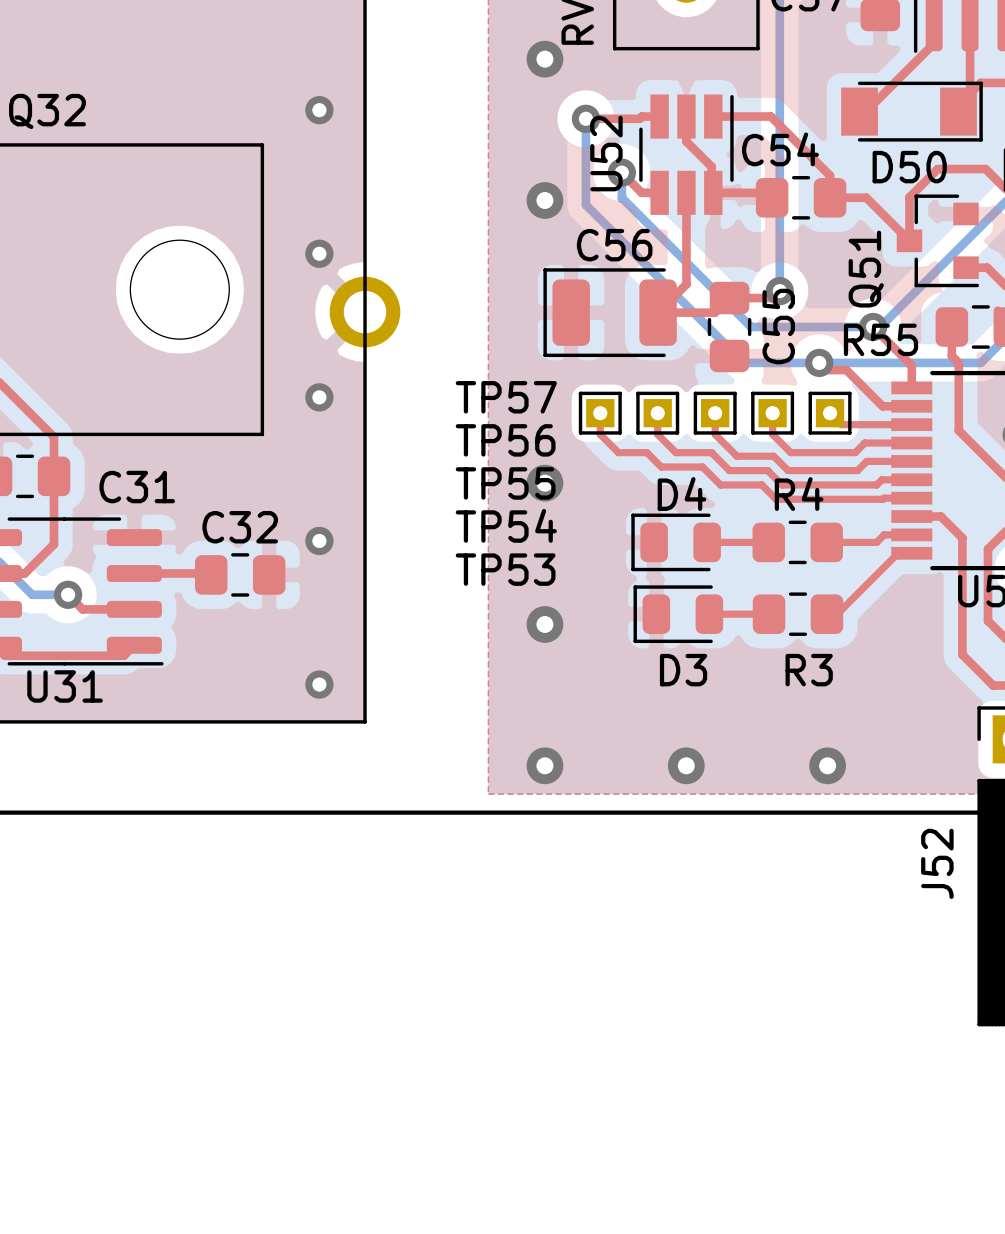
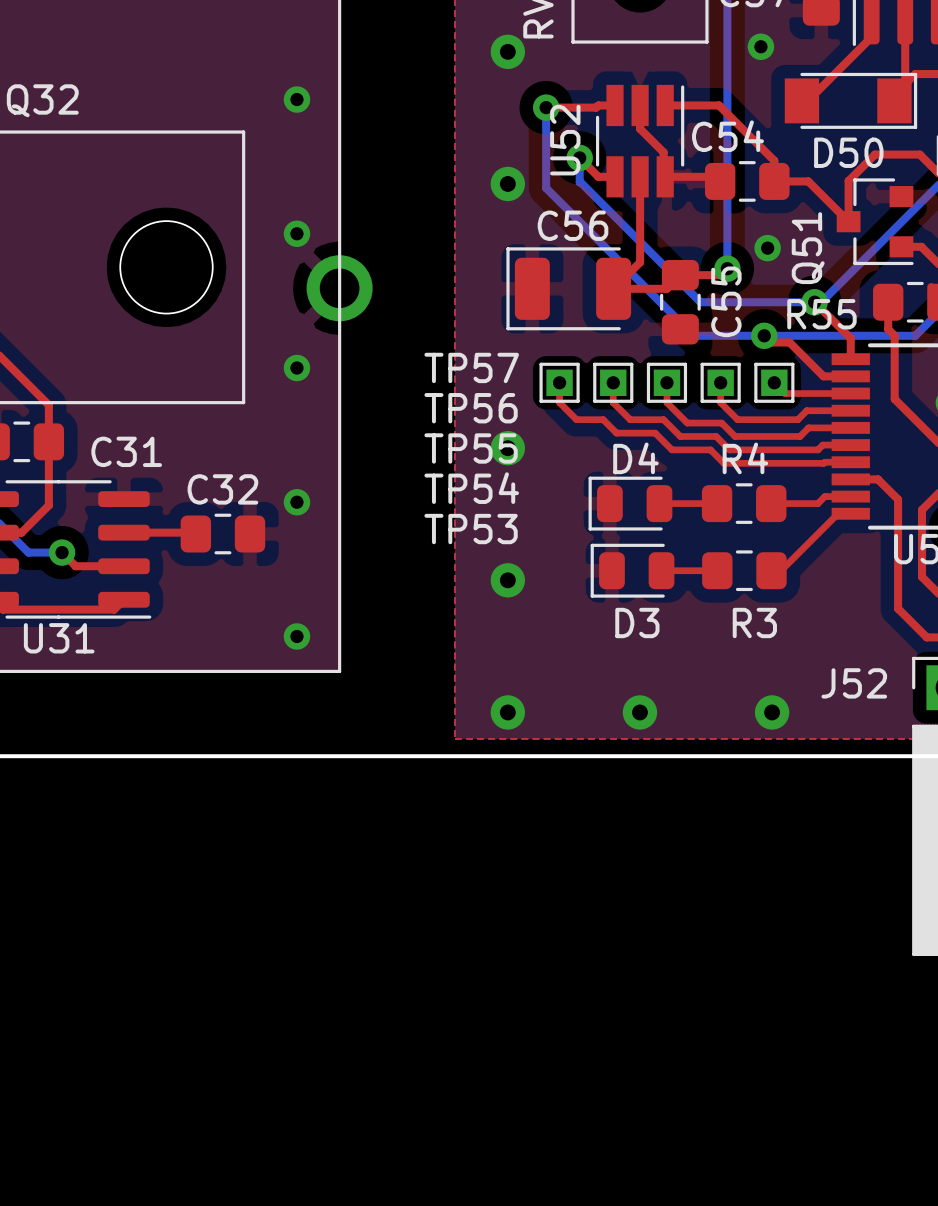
via: none -> (760, 46)
via: none -> (767, 248)
J52 name rotation: 0° (937, 863) -> 90° clockwise (854, 683)
J52 name position: J52 (937, 863) -> J52 (854, 683)

